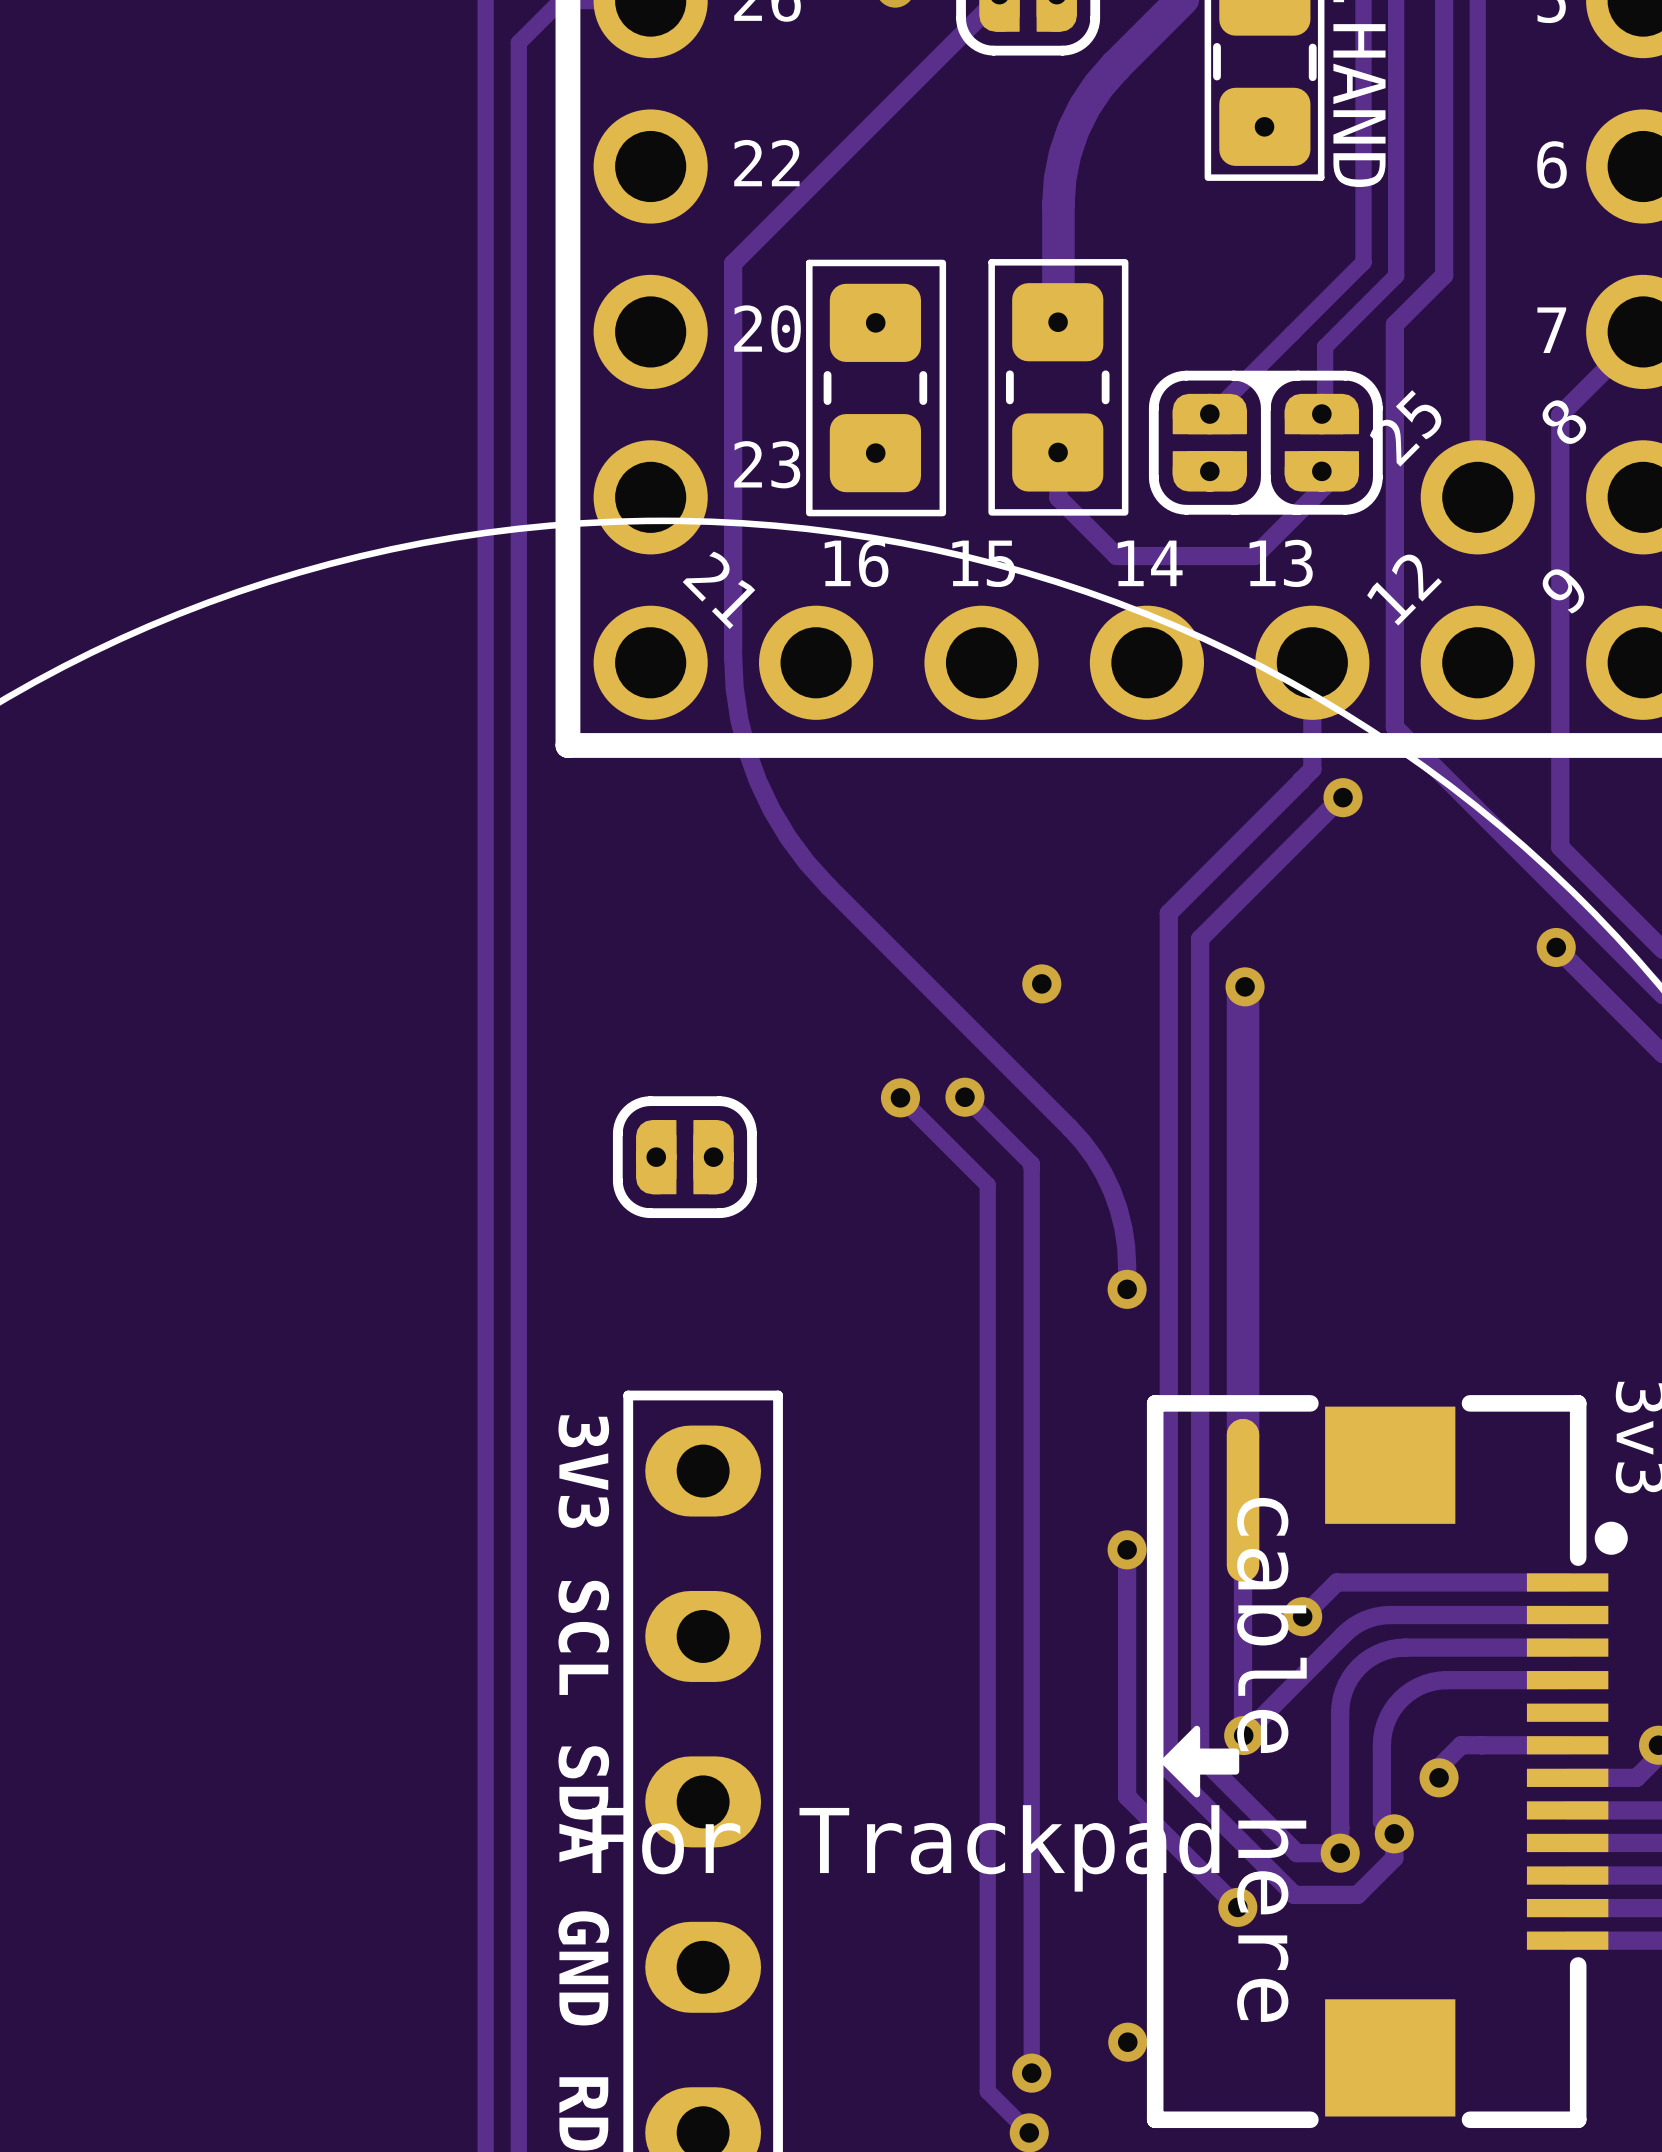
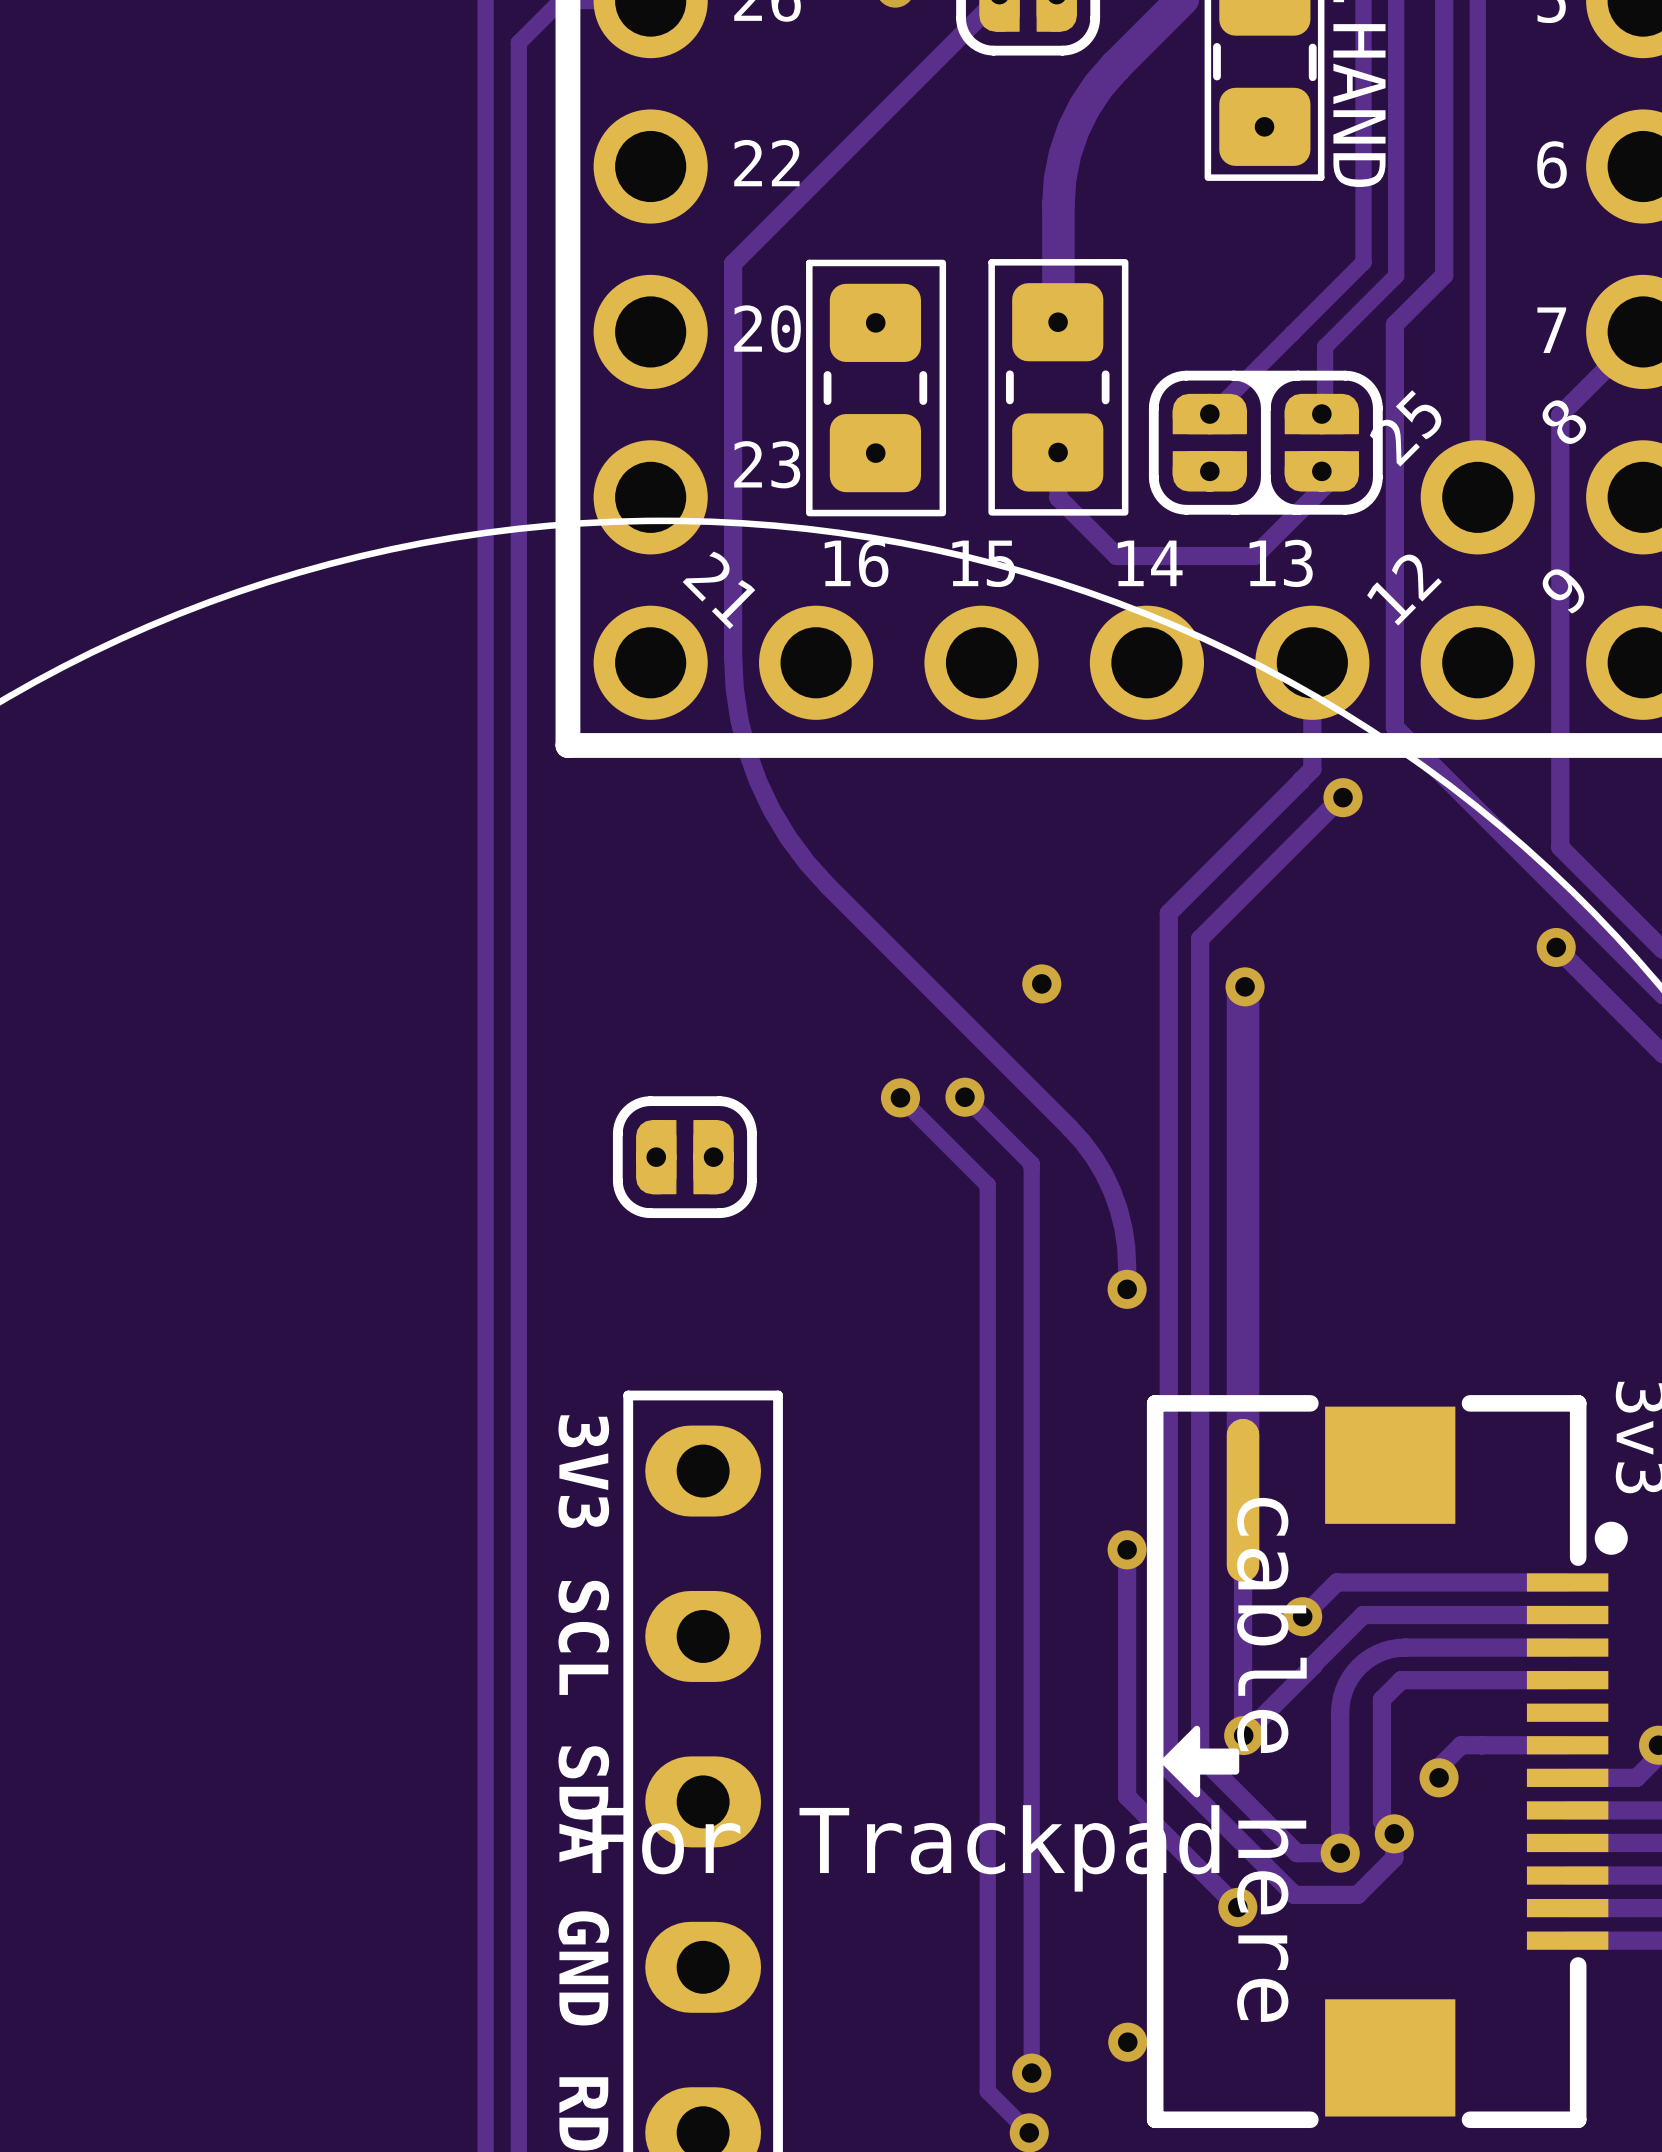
track: (1390, 1615) (1371, 1617) (1348, 1629) (1243, 1735) -> (1313, 1665) (1243, 1735)
track: none -> (1390, 1615) (1363, 1615) (1313, 1664)
track: (1447, 1680) (1425, 1683) (1412, 1690) (1400, 1699) (1391, 1710) (1385, 1723) (1381, 1745) -> (1447, 1680) (1401, 1680) (1381, 1699) (1381, 1745)

